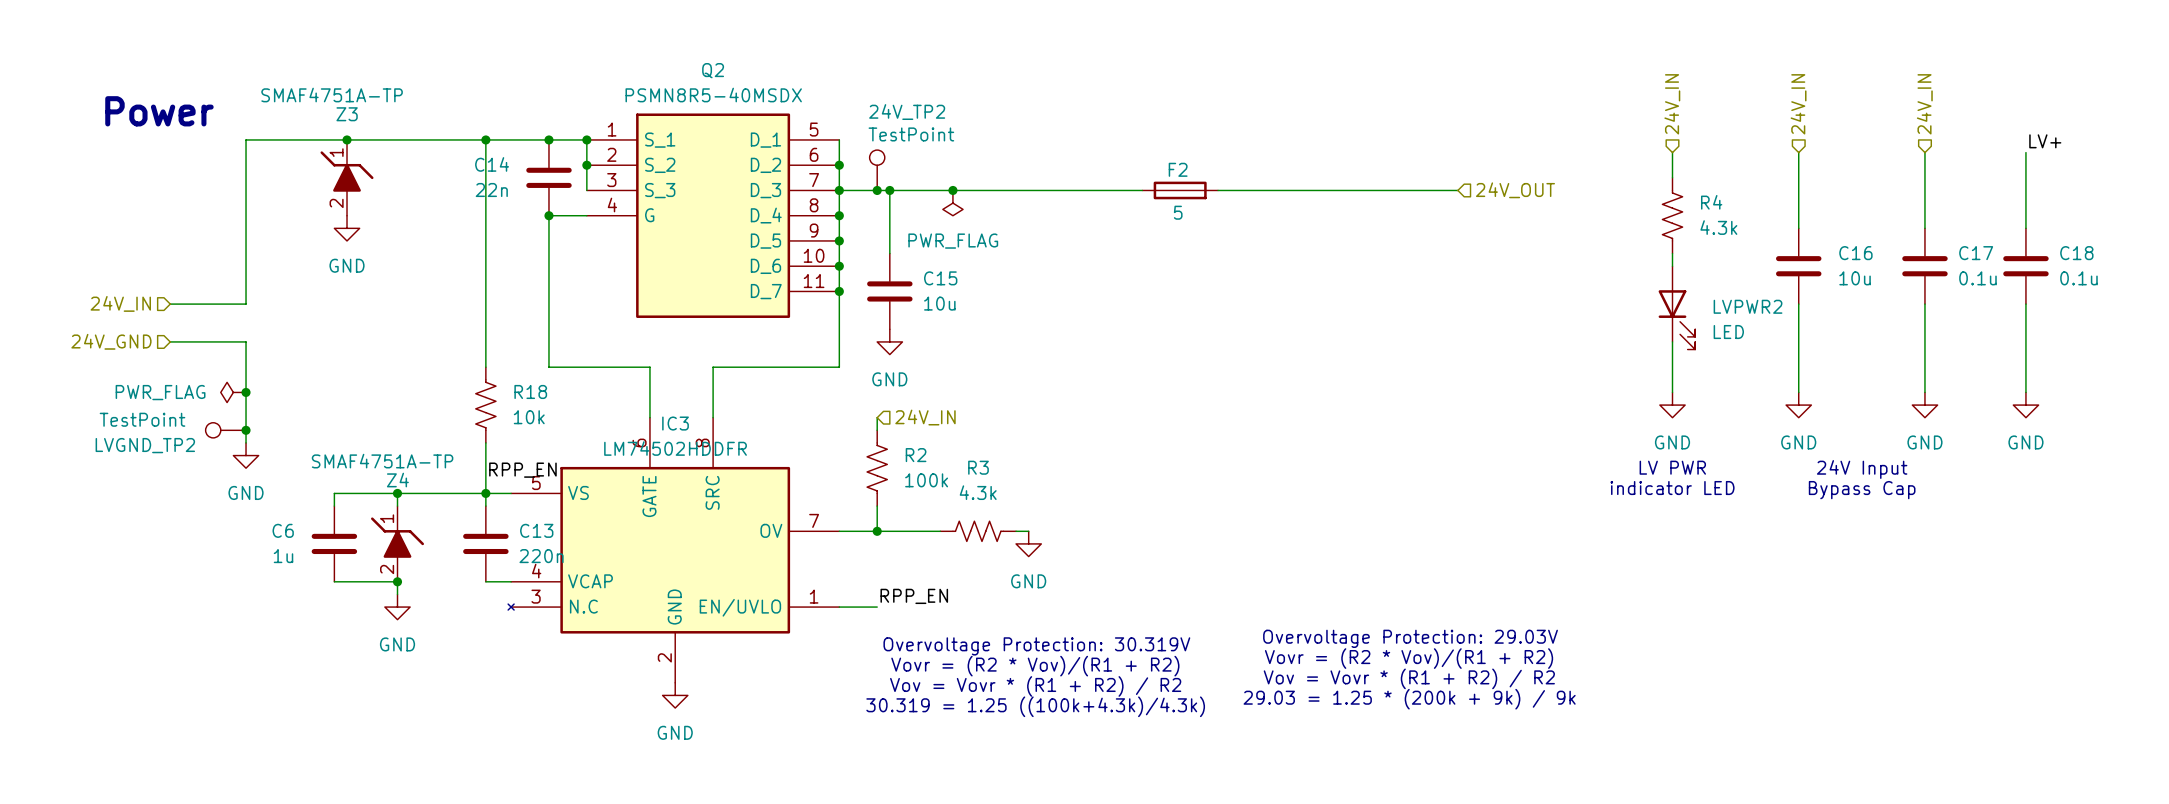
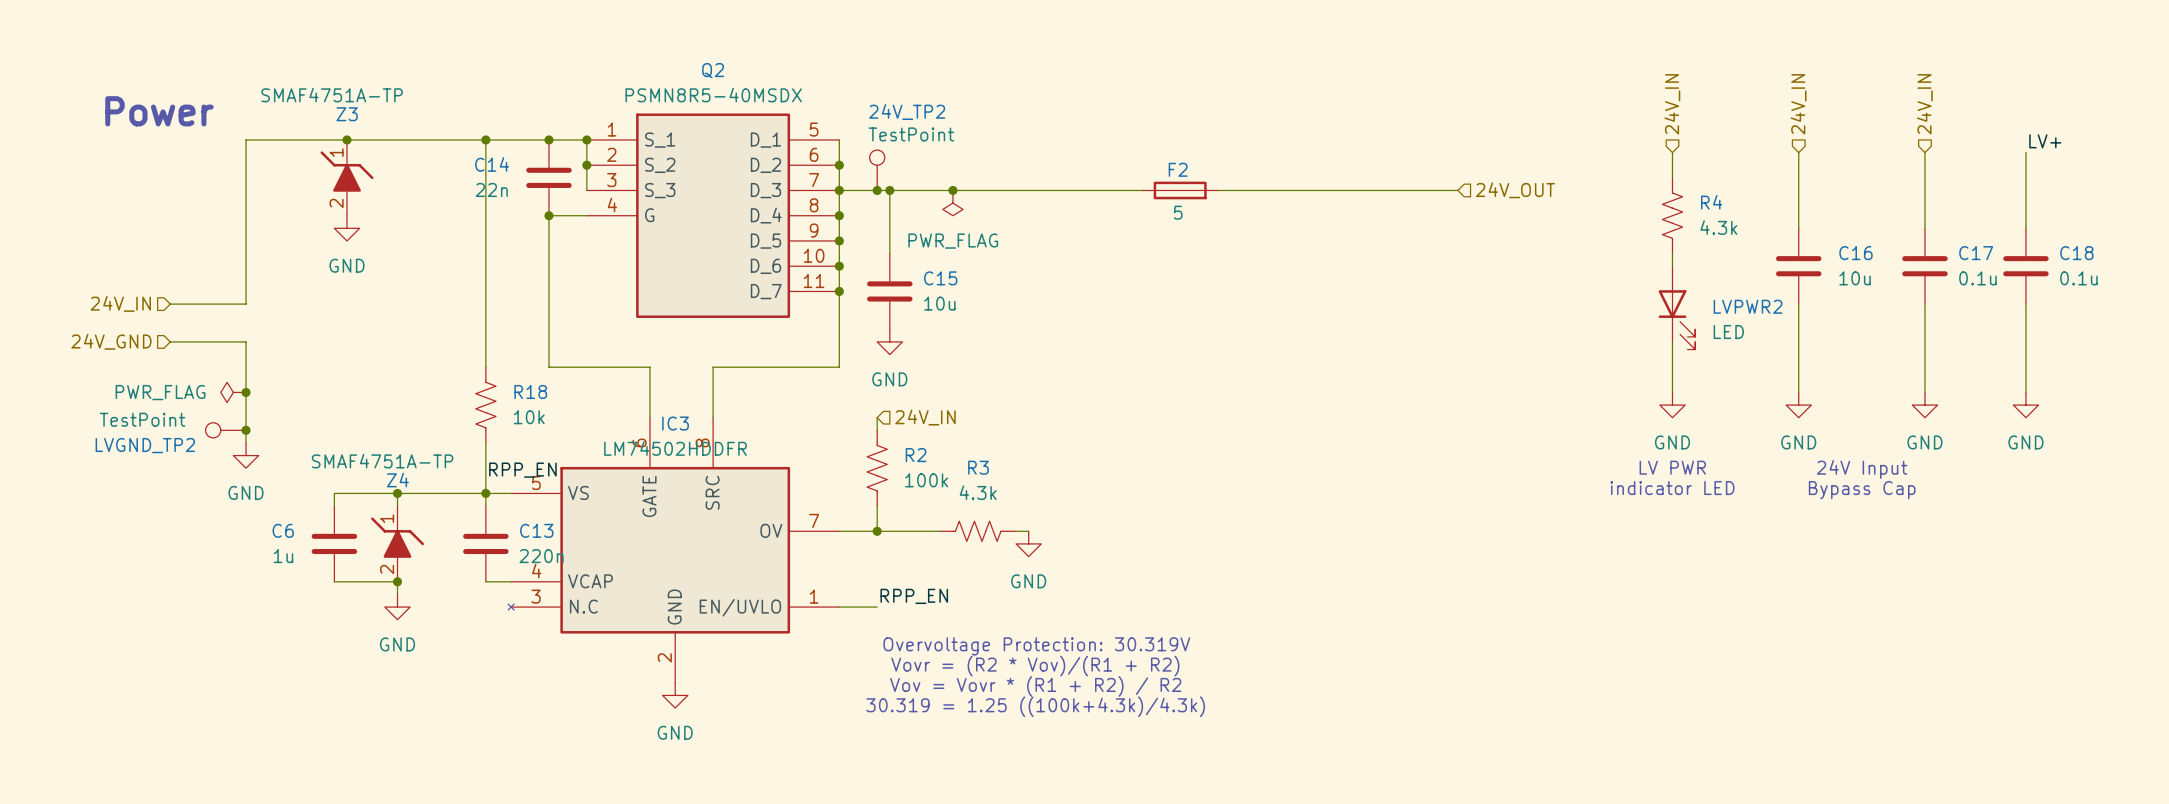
text: Overvoltage Protection: 29.03V (1410, 638) -> none
text: Vovr = (R2 * Vov)/(R1 + R2) (1409, 658) -> none
text: Vov = Vovr * (R1 + R2) / R2 (1409, 678) -> none
text: 29.03 = 1.25 * (200k + 9k) / 9k (1409, 699) -> none

